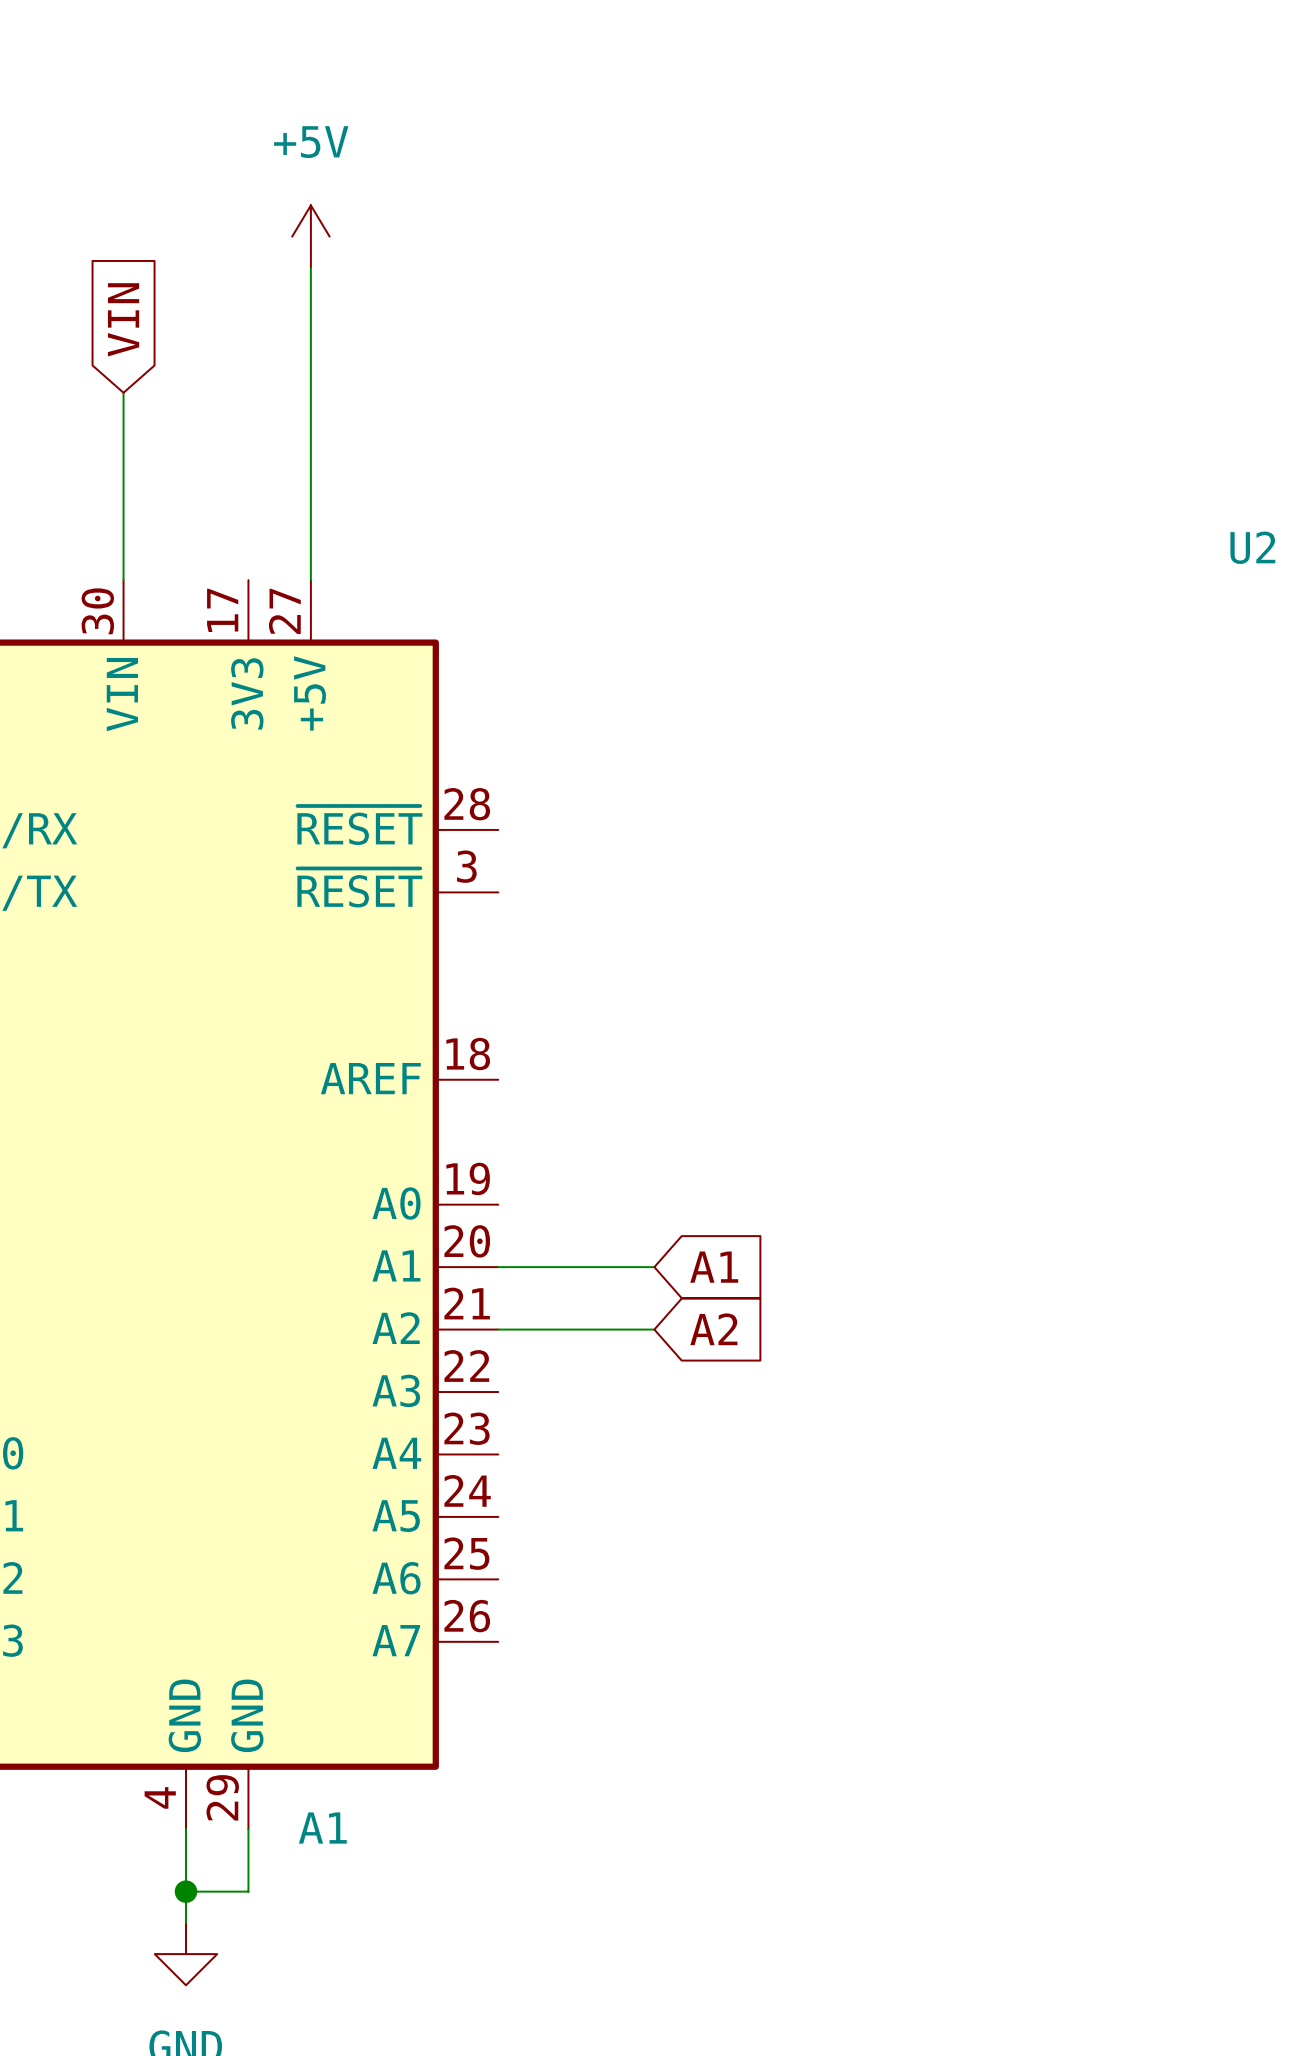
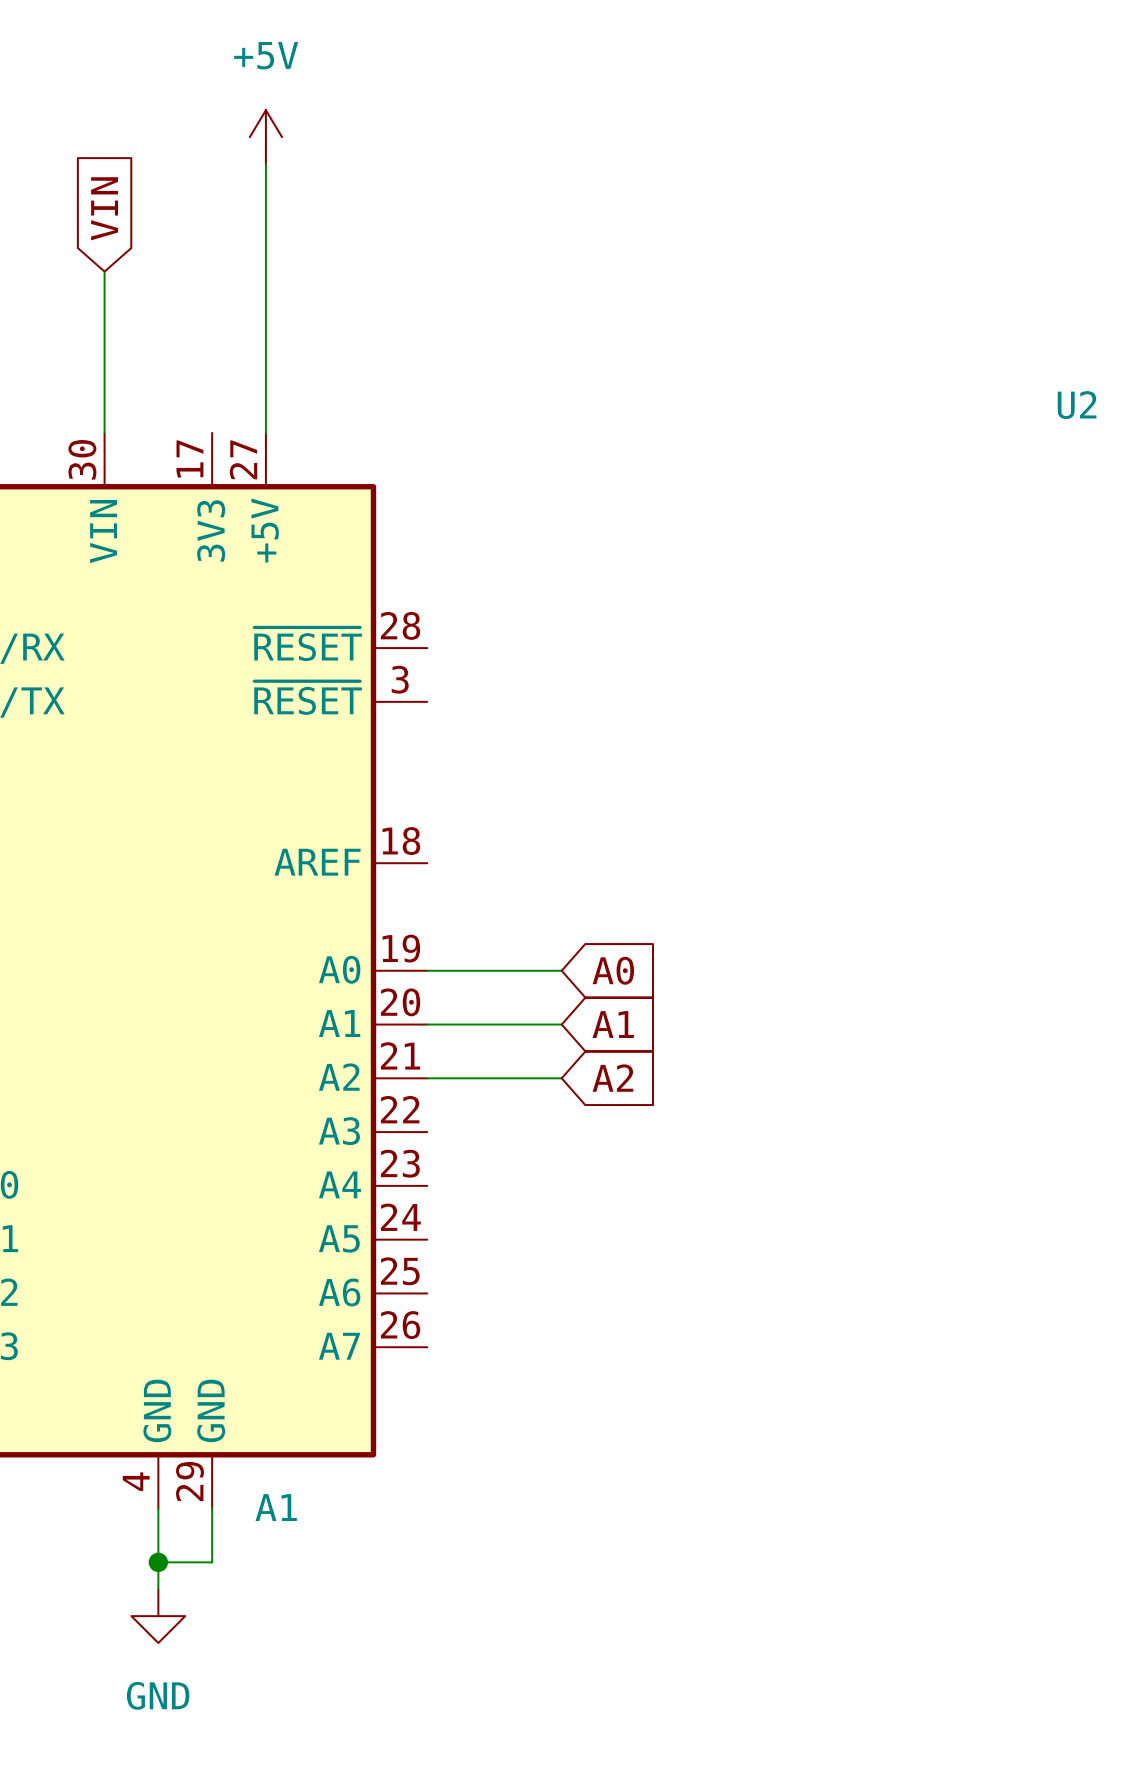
wire: none -> (427, 970) (561, 970)
global label: none -> A0 (613, 970)

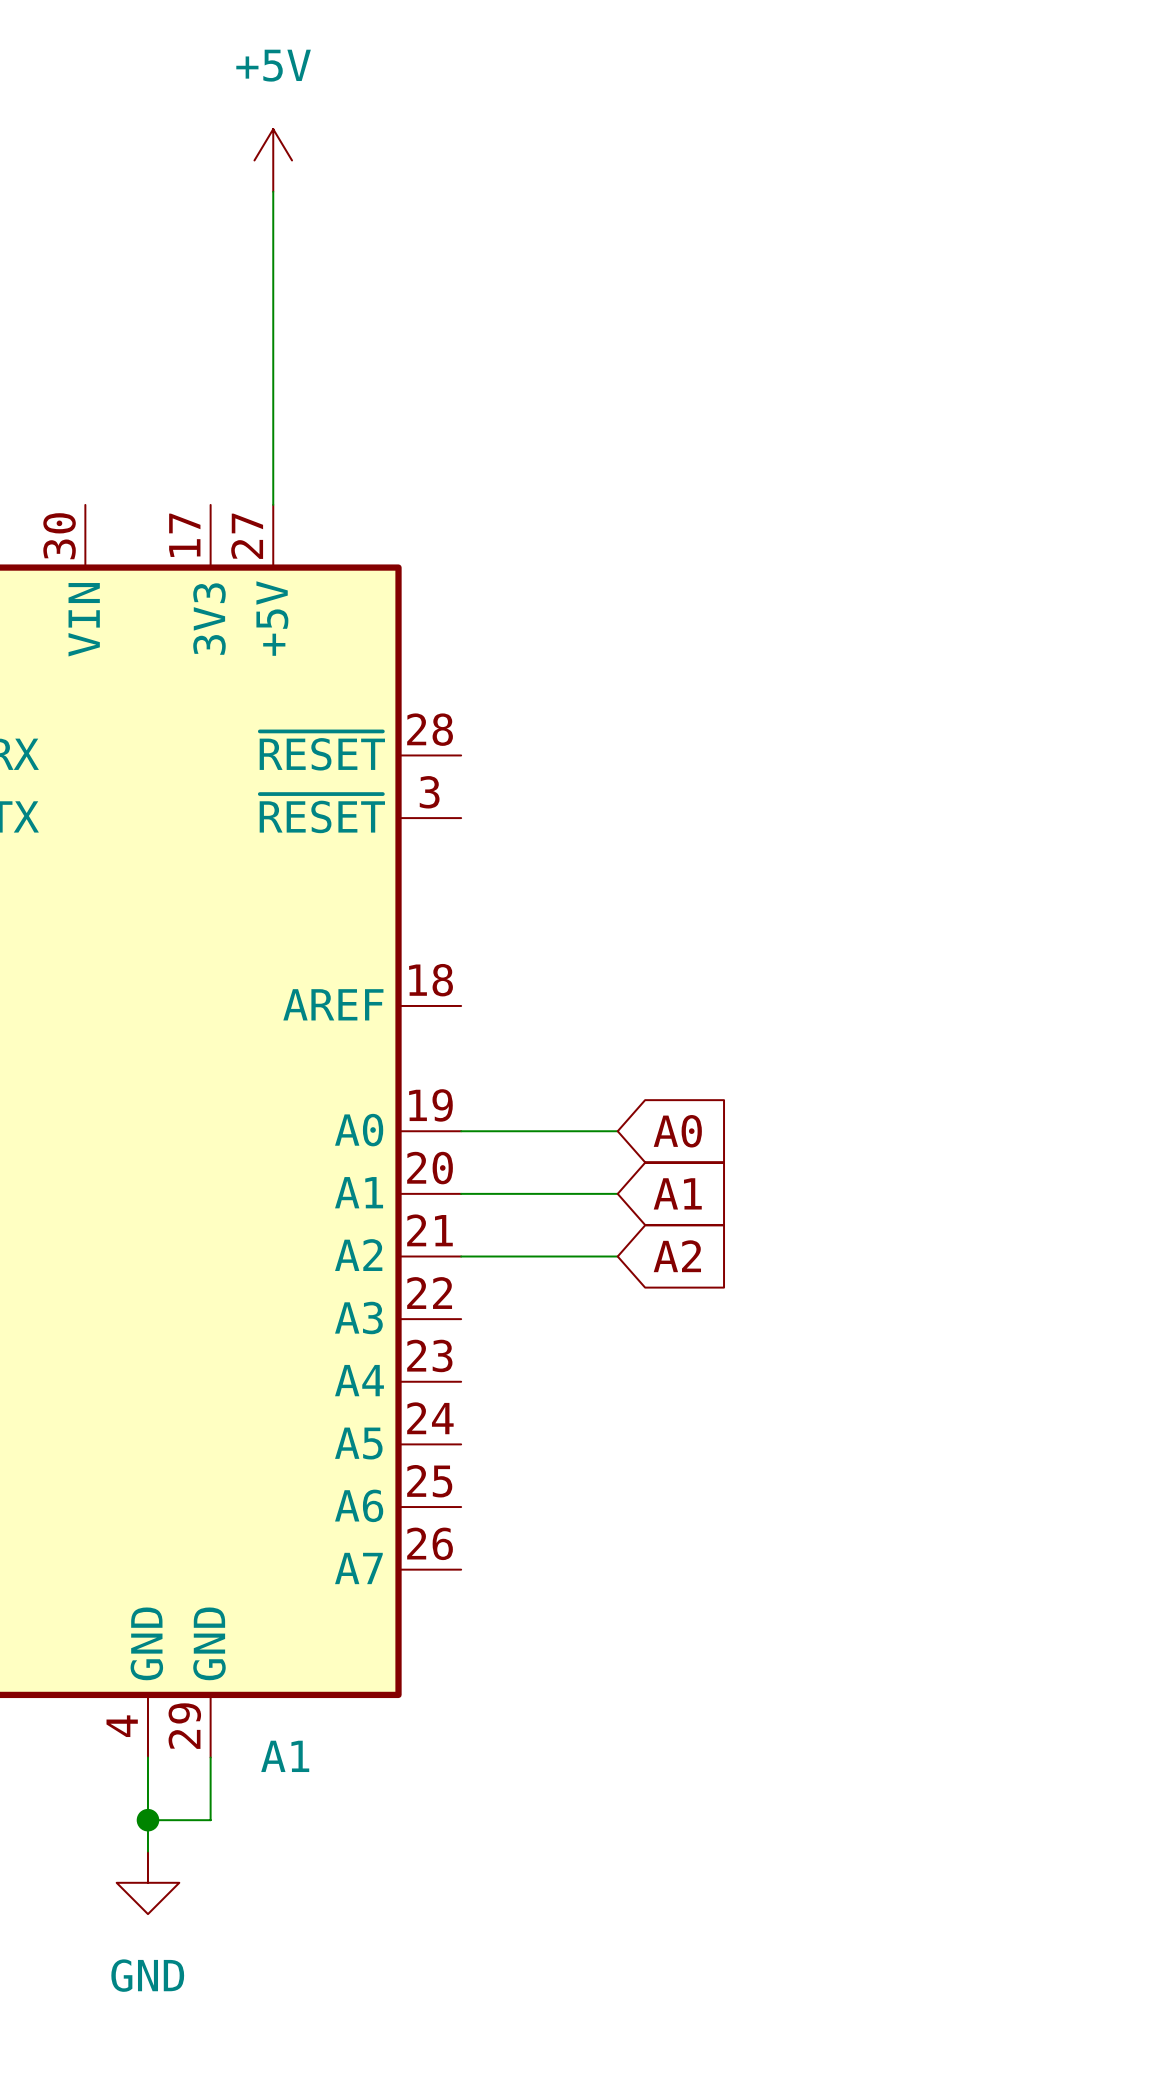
global label: VIN (104, 208) -> none
wire: (104, 271) (104, 432) -> none

